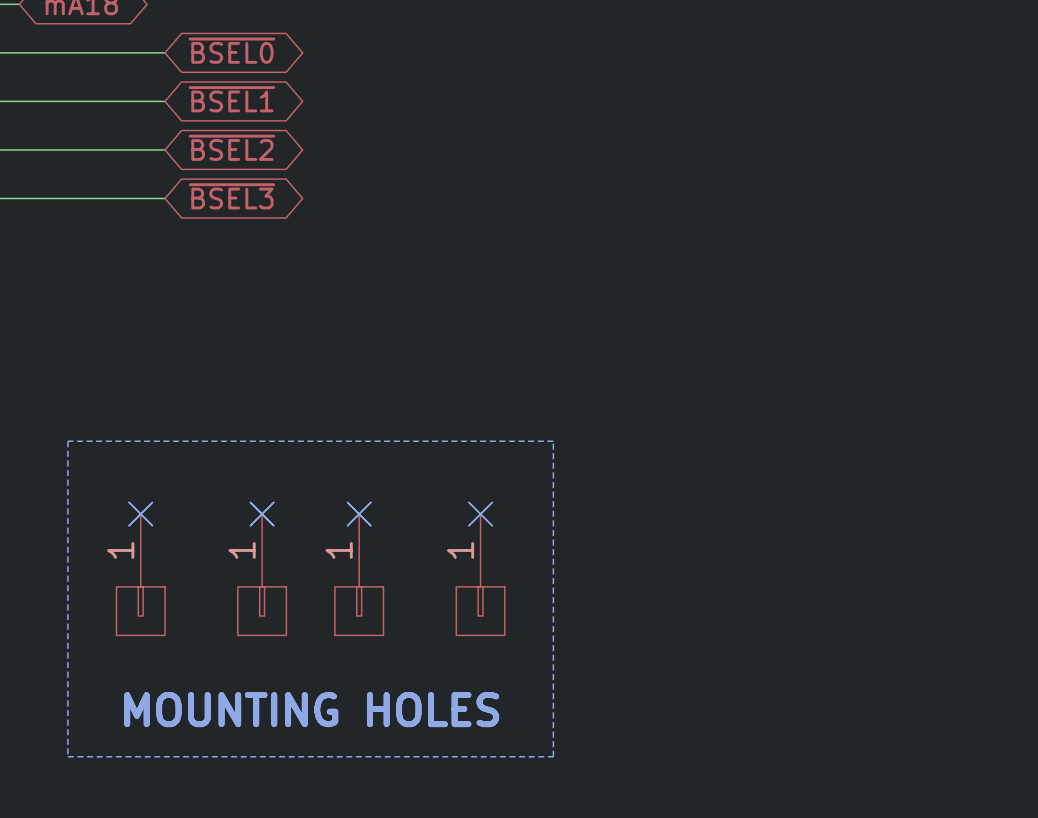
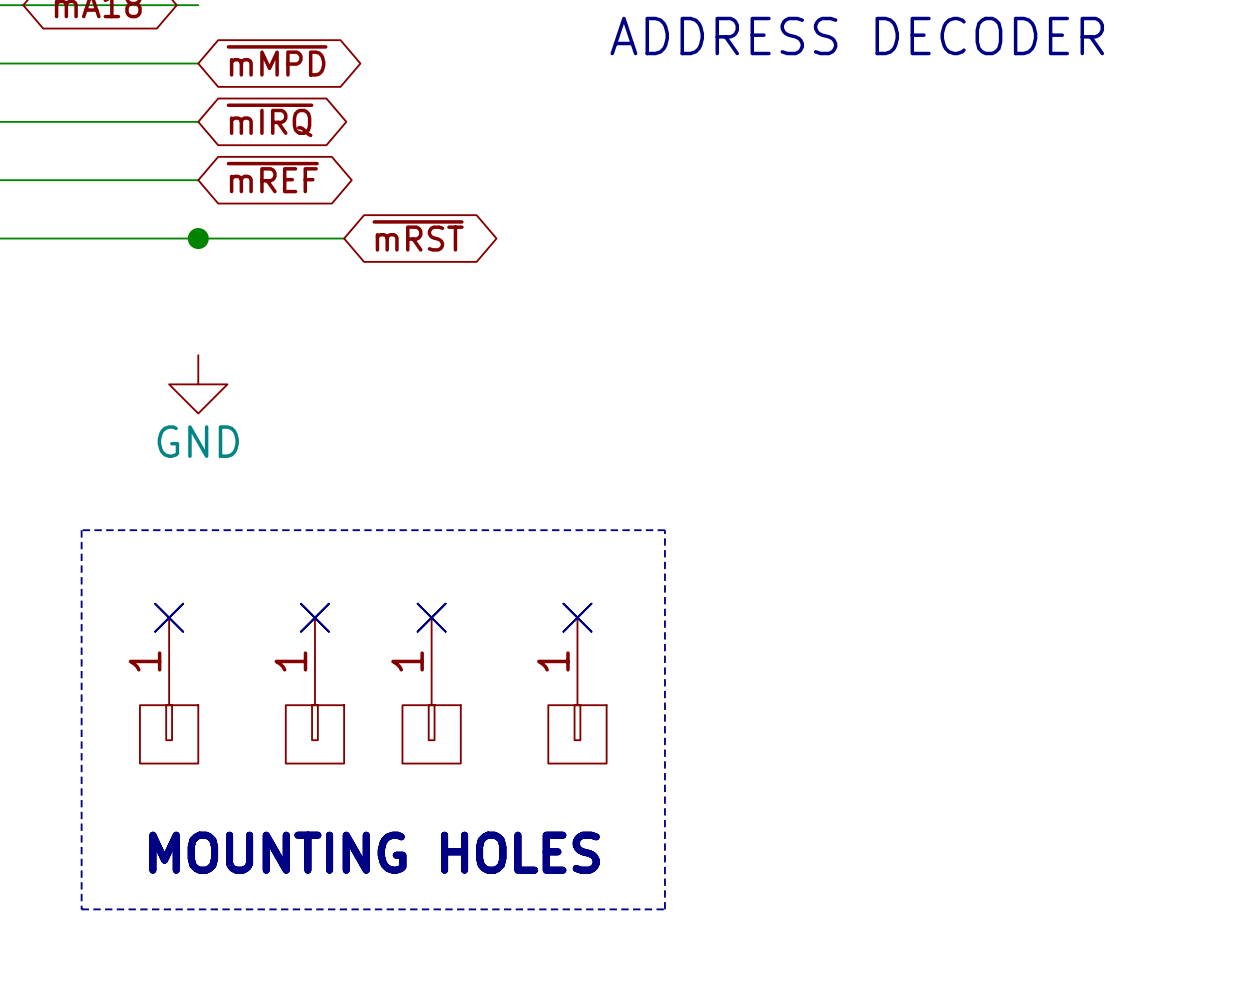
wire: none -> (23, 5) (198, 5)
text: none -> ADDRESS DECODER (857, 36)
global label: ~{BSEL0} (231, 50) -> ~{mMPD} (277, 60)
global label: ~{BSEL1} (231, 99) -> ~{mIRQ} (270, 120)
global label: ~{BSEL2} (231, 147) -> ~{mREF} (272, 177)
global label: ~{BSEL3} (231, 196) -> none
global label: none -> ~{mRST} (418, 235)
wire: none -> (198, 238) (344, 238)
junction: none -> (198, 238)
power symbol: none -> GND (198, 384)

